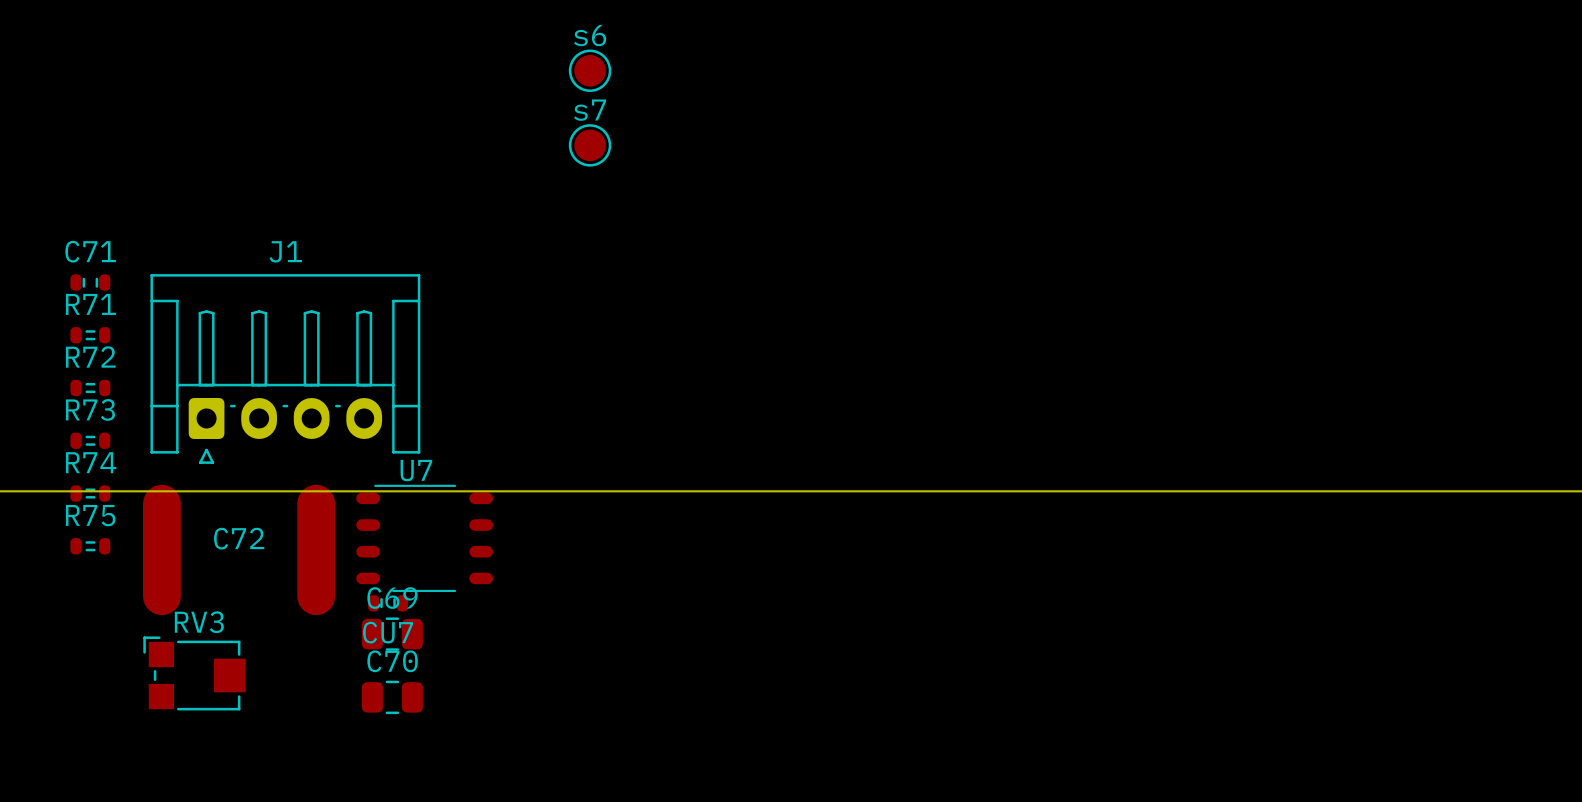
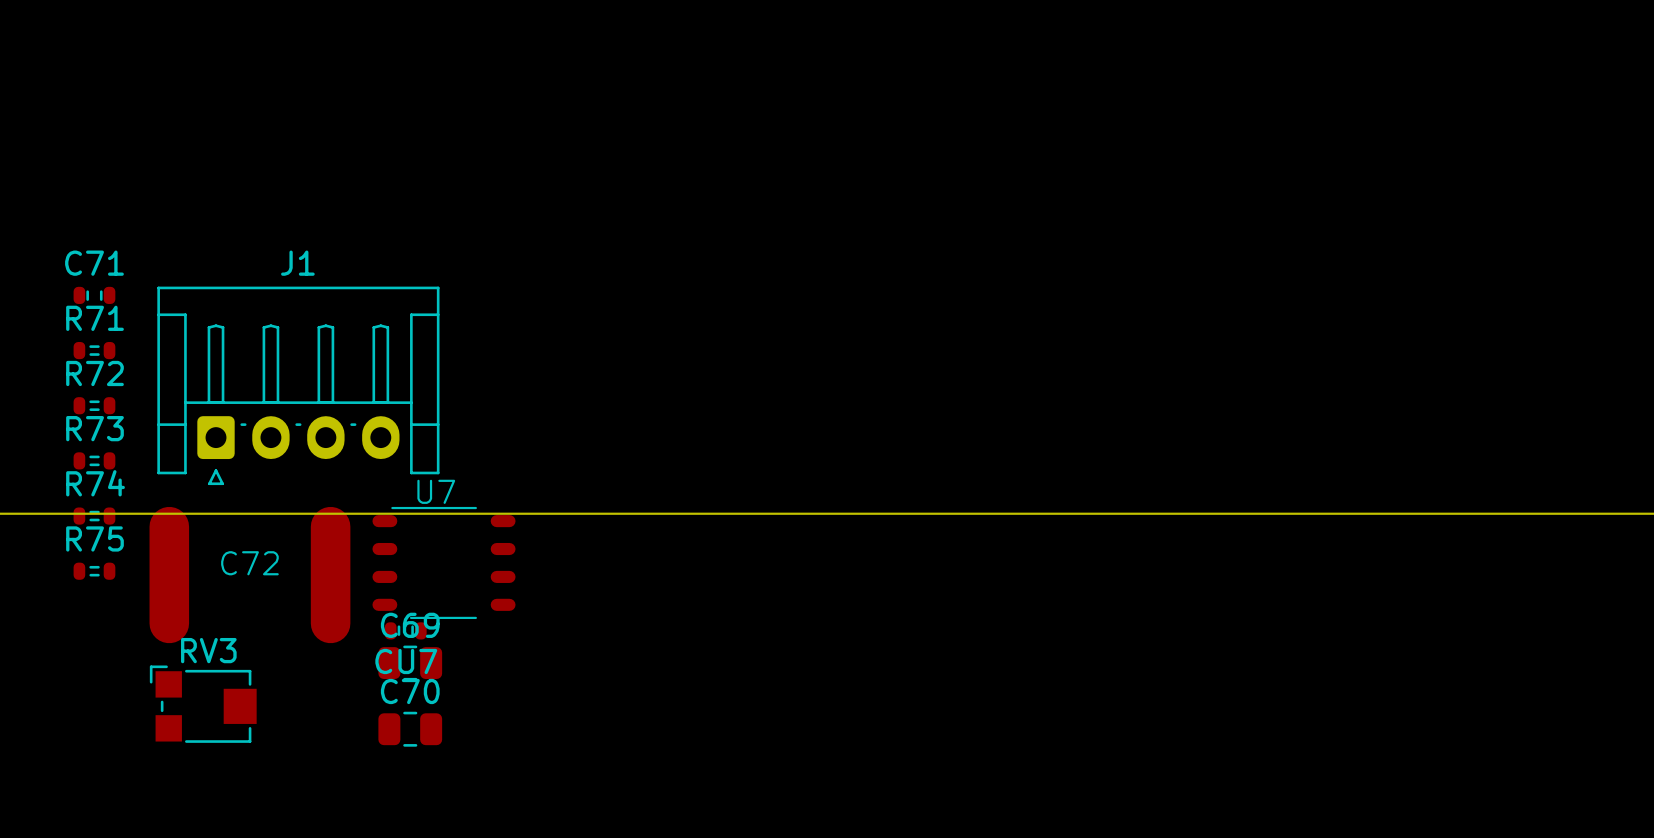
s6: (590, 70) -> none
s7: (590, 145) -> none

